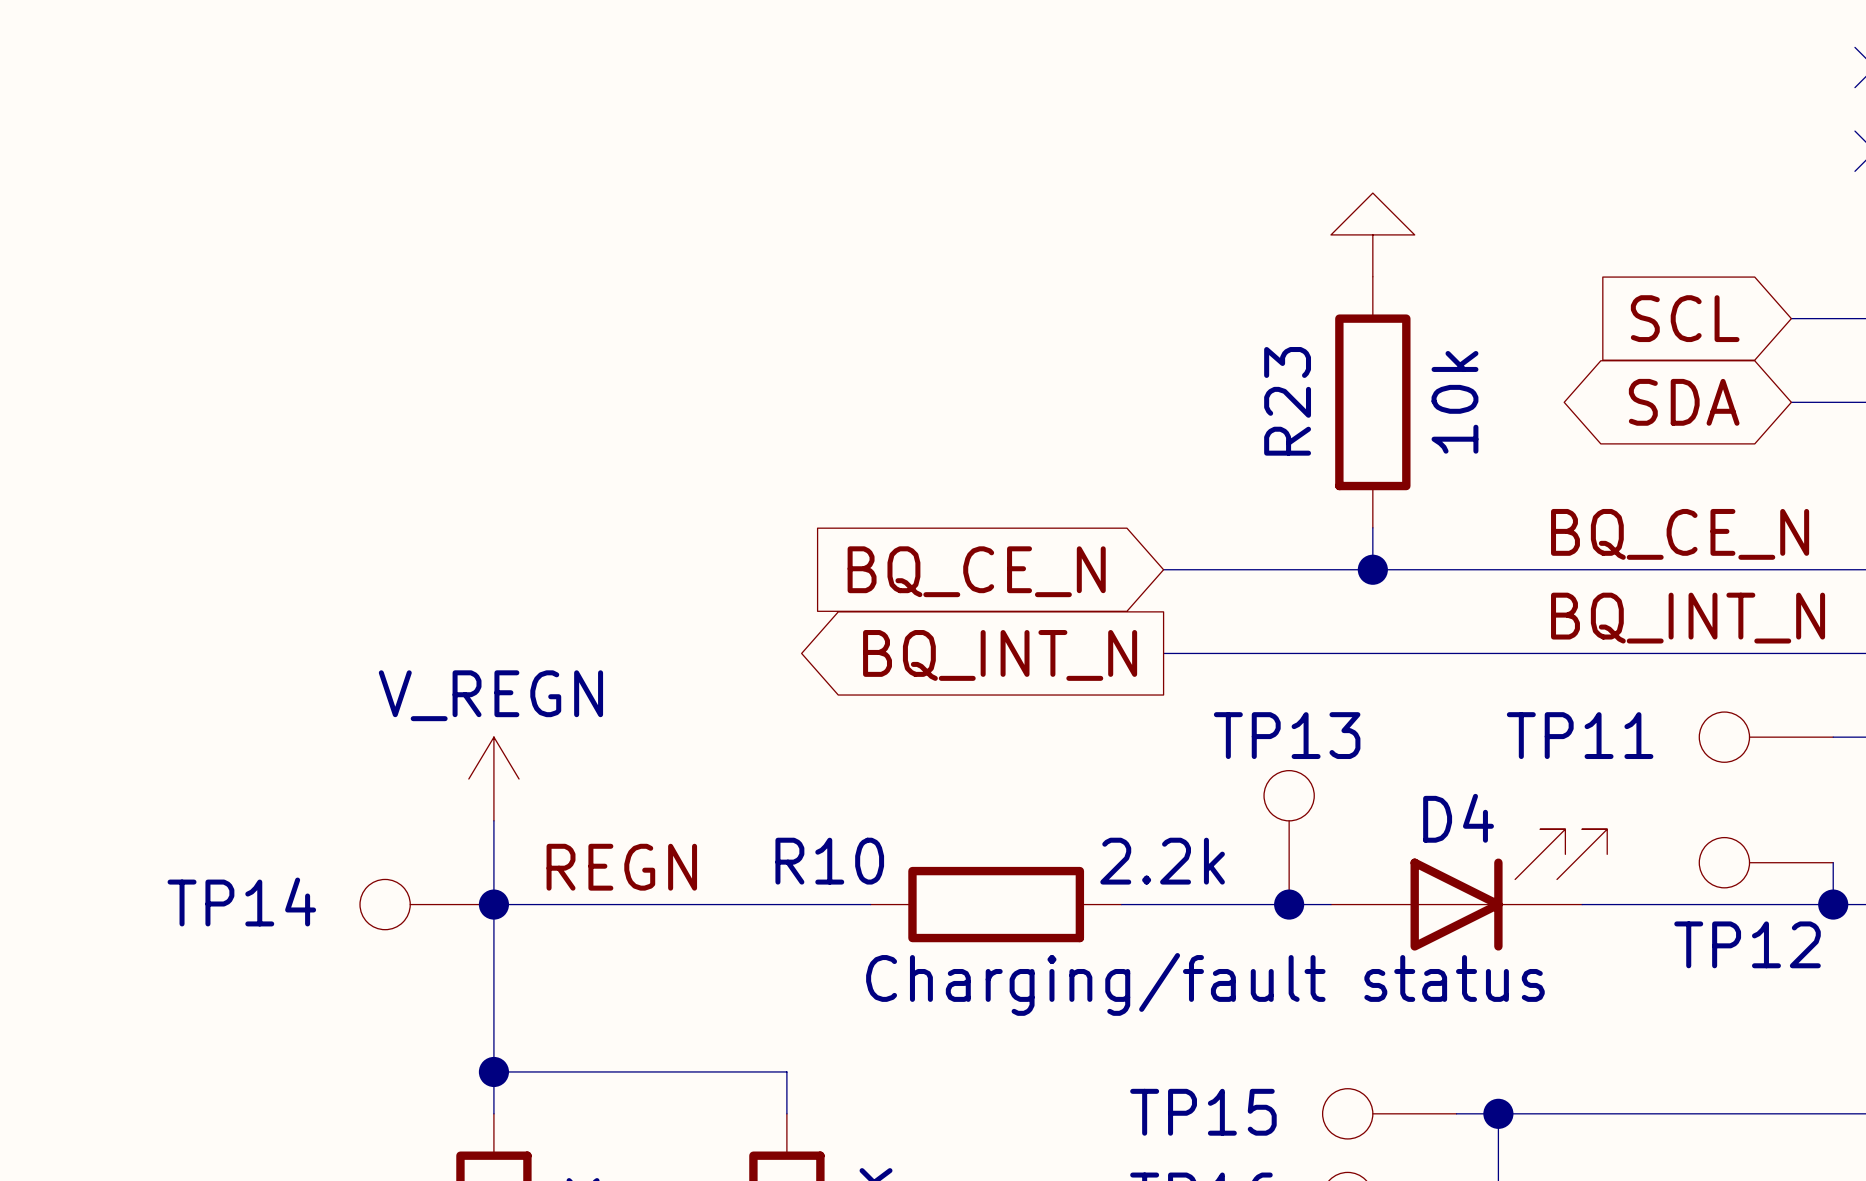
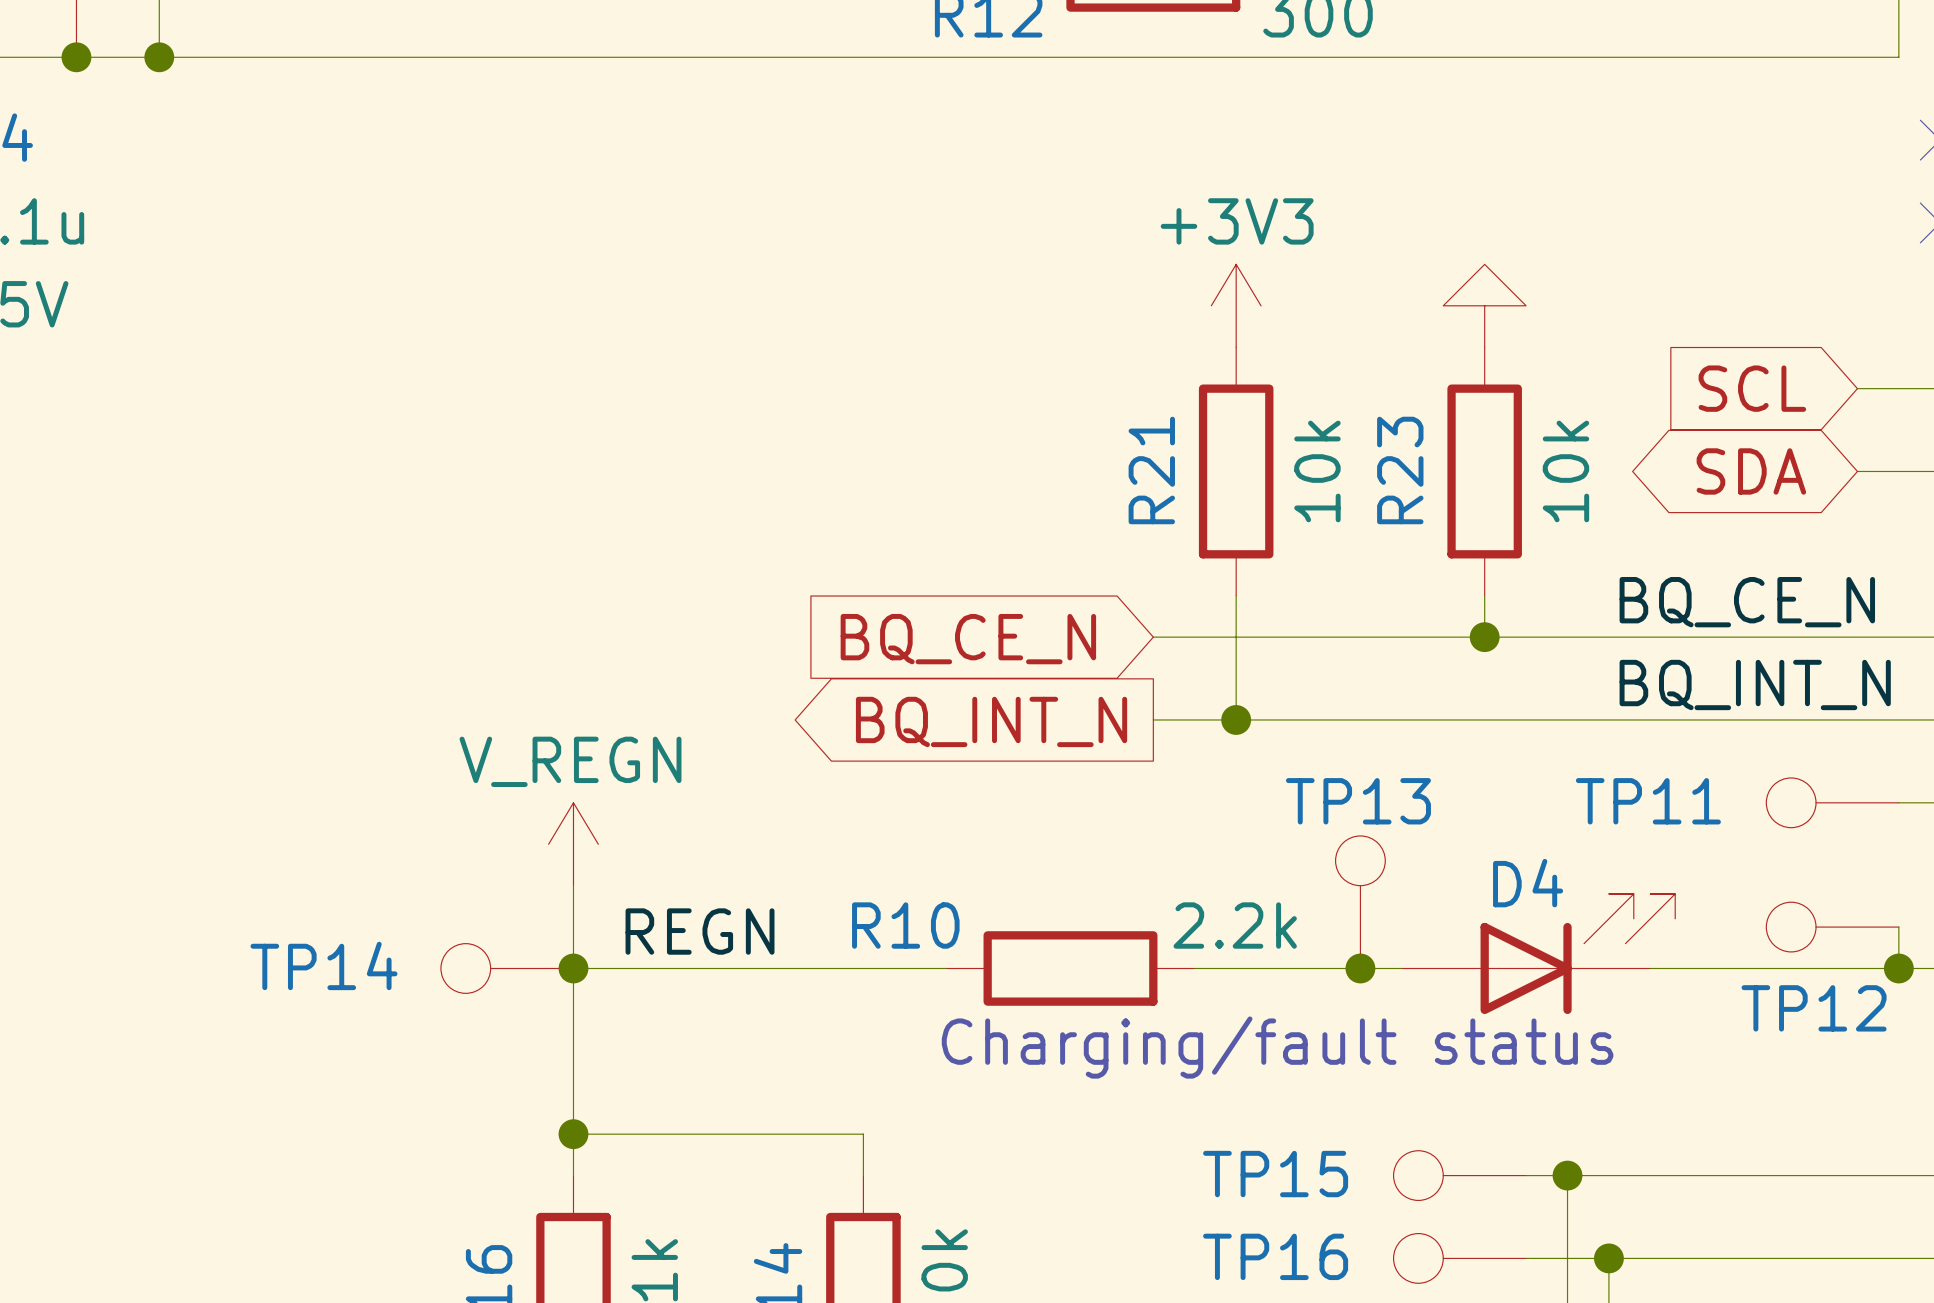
power symbol: none -> +3V3 (1236, 305)
power symbol position: (1372, 234) -> (1484, 305)
R21: none -> 10k (1236, 471)
R23 position: (1372, 402) -> (1484, 471)
wire: none -> (1236, 595) (1236, 719) (1153, 719)
wire: (1372, 527) (1372, 569) -> (1484, 595) (1484, 637)
wire: none -> (1153, 637) (1236, 637)
junction position: (1372, 569) -> (1484, 637)
global label position: BQ_CE_N (976, 571) -> BQ_CE_N (968, 639)
junction: none -> (1236, 719)
global label position: BQ_INT_N (1000, 655) -> BQ_INT_N (991, 721)

